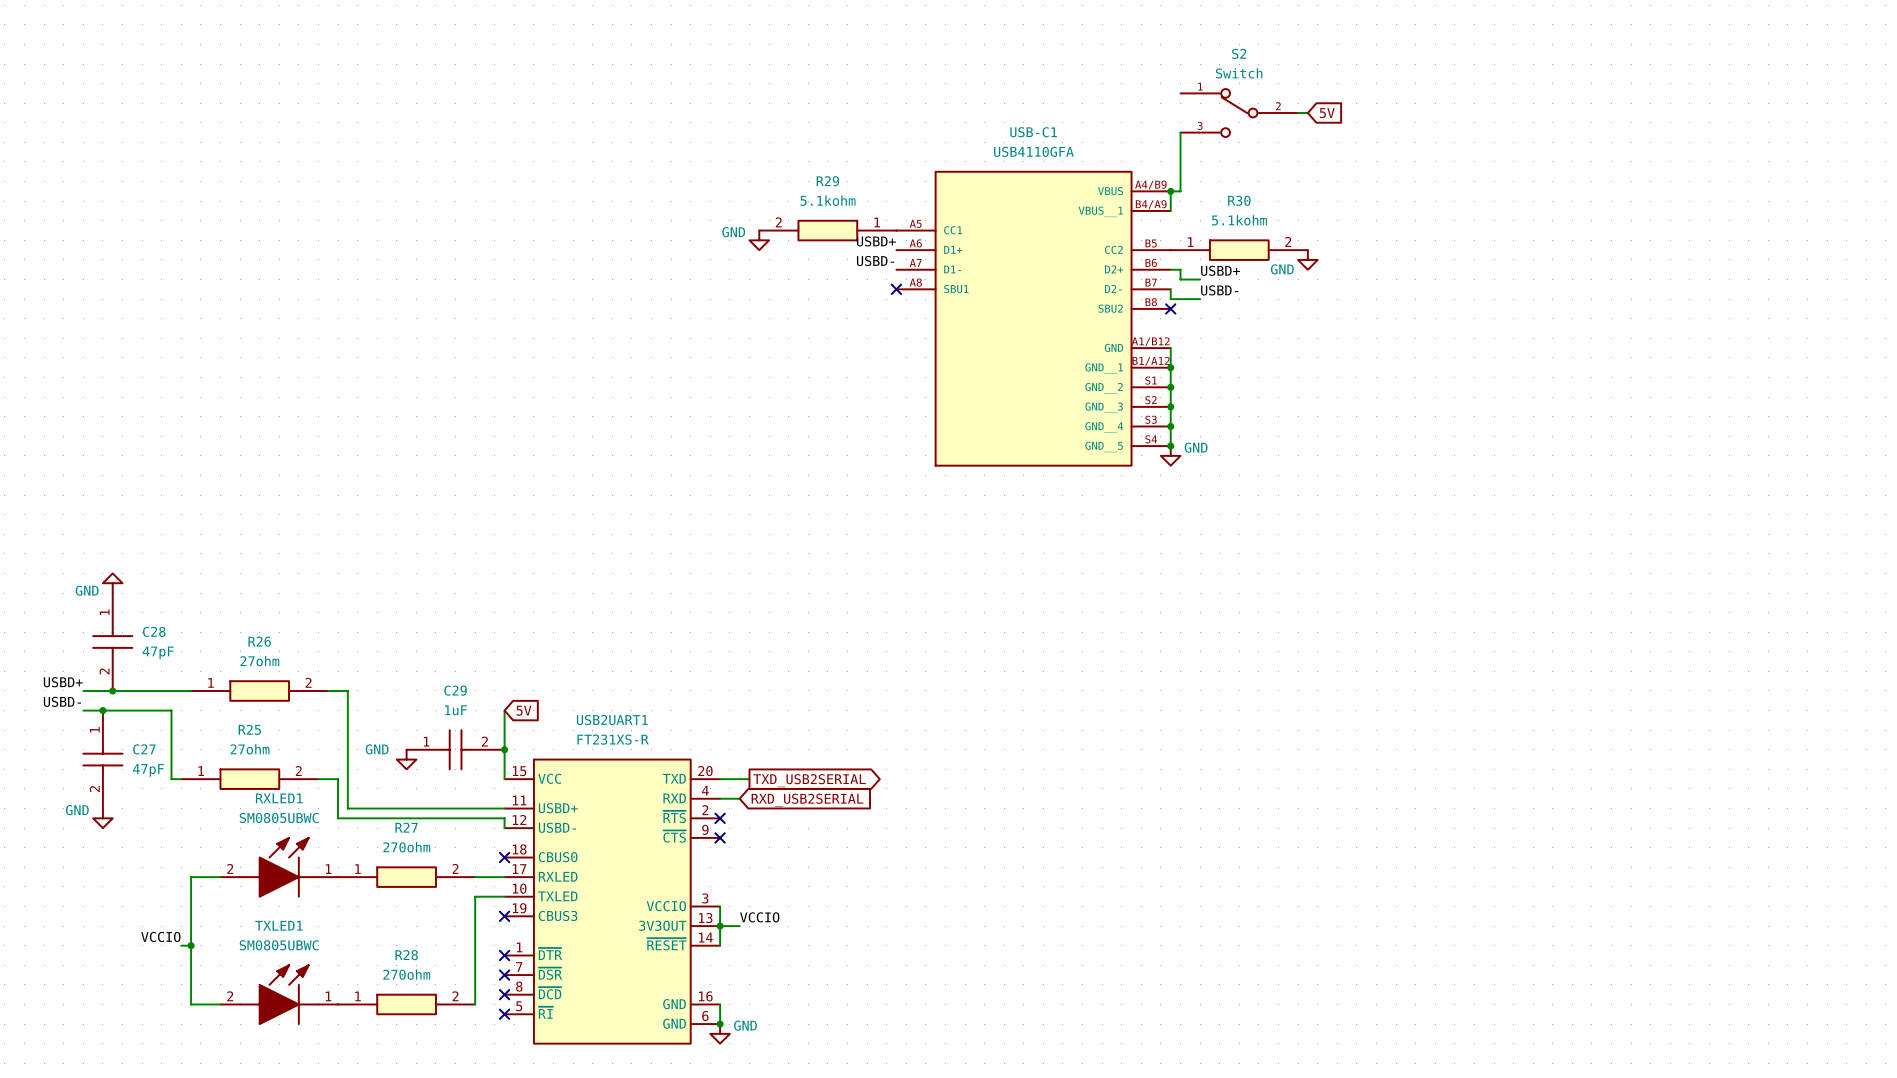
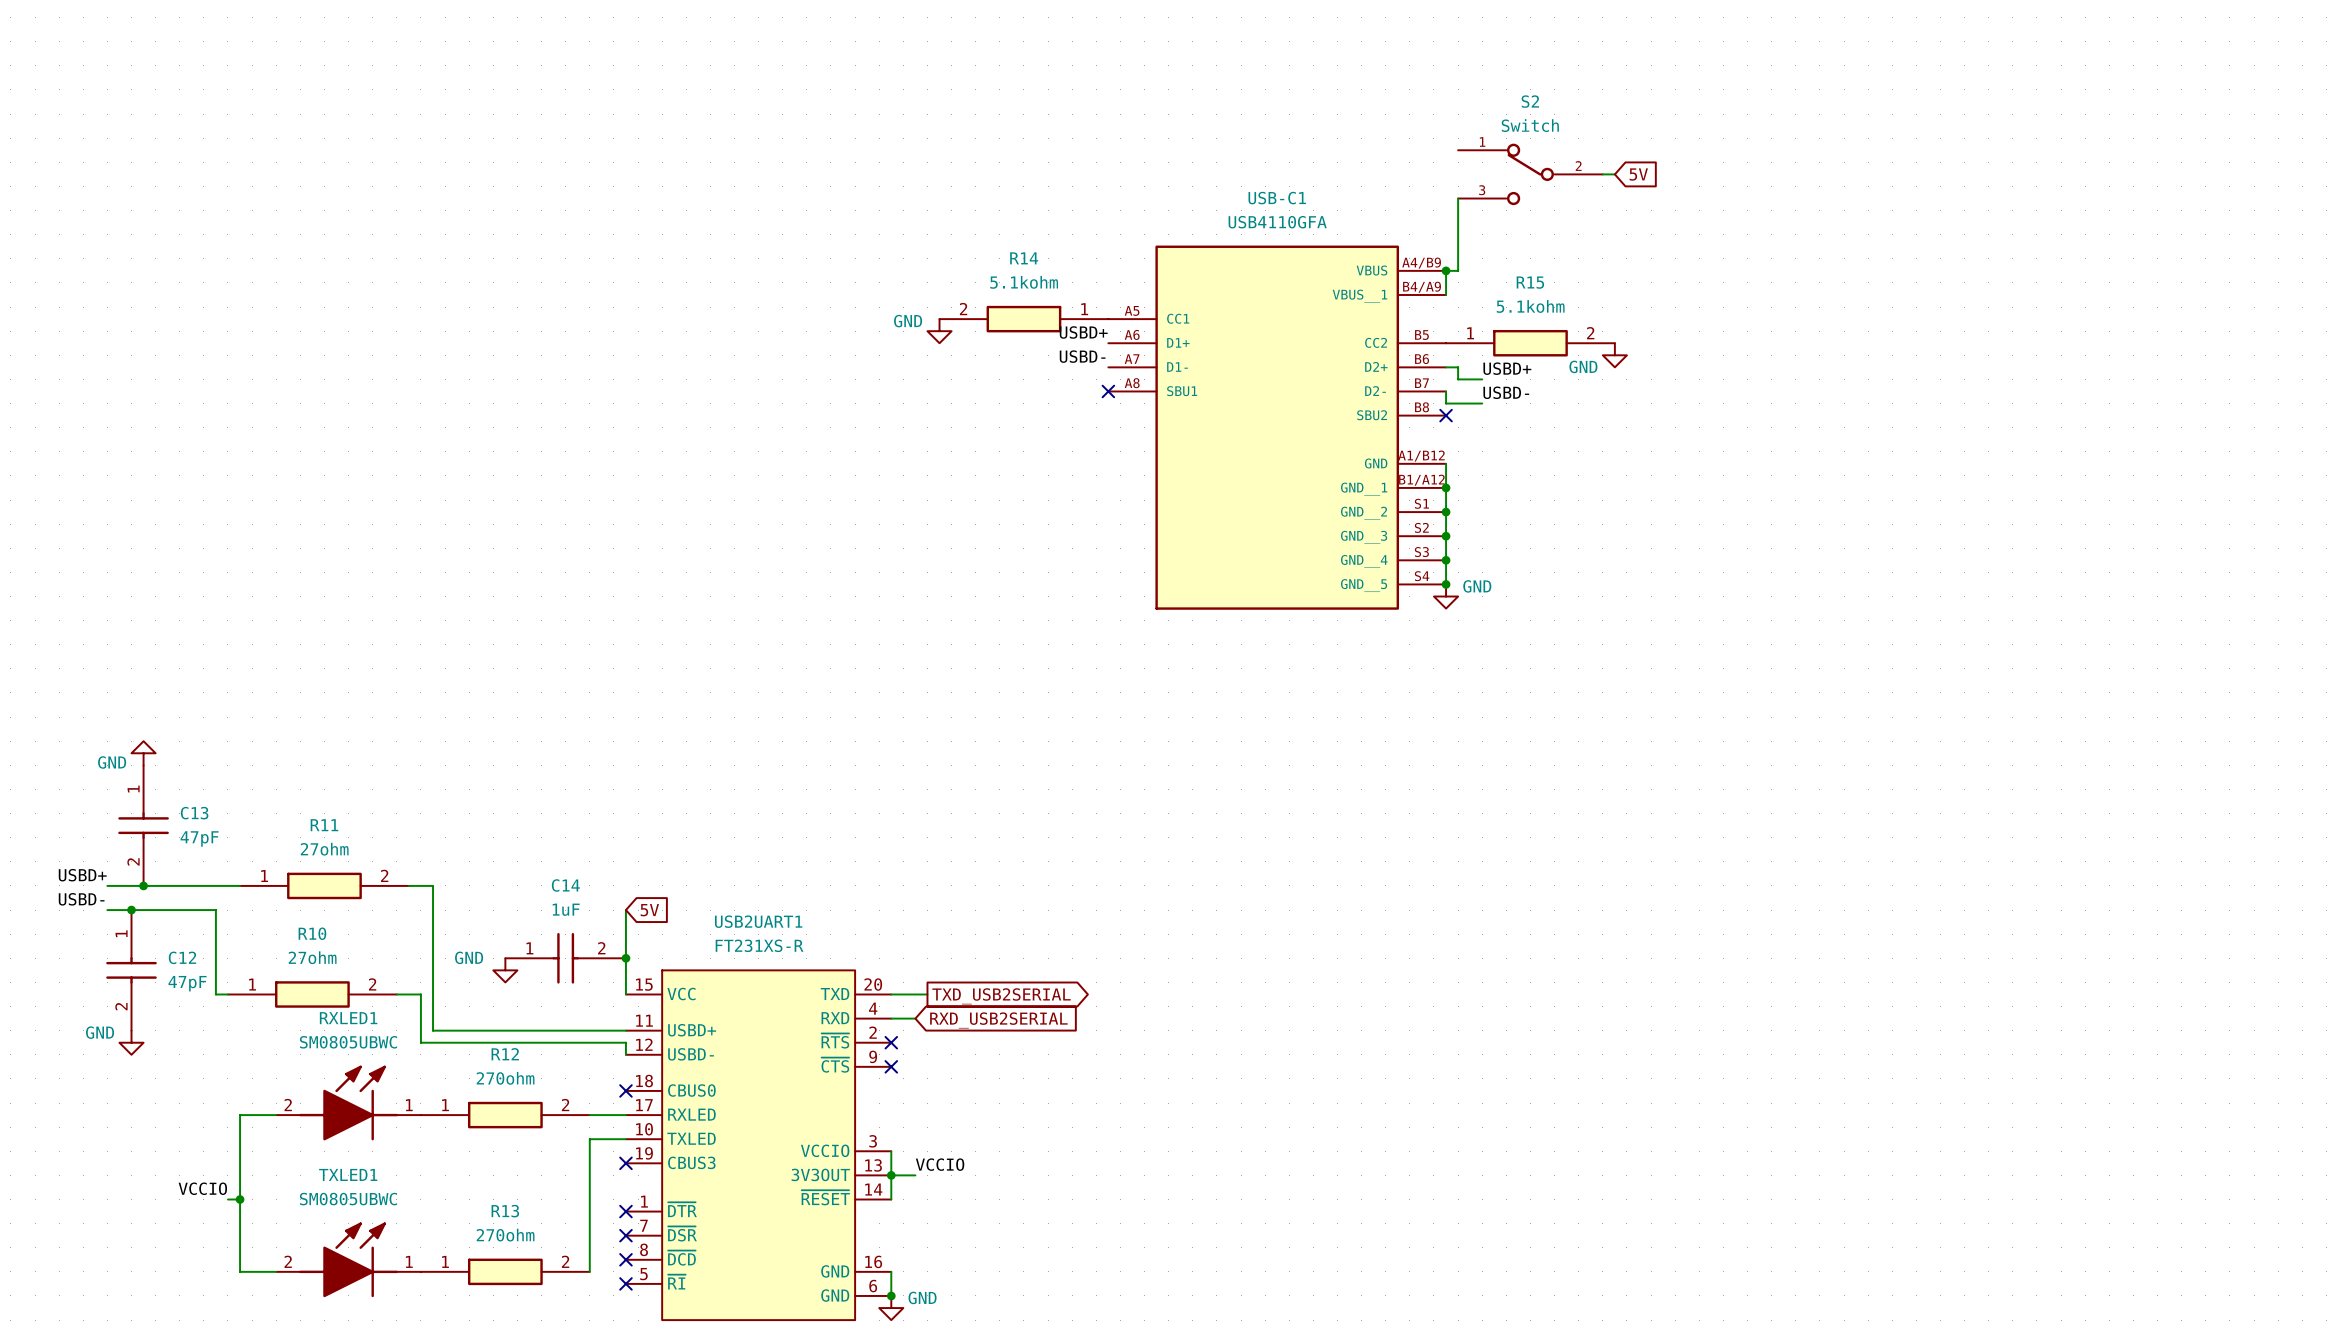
R29 name: R29 (827, 181) -> R14 (1024, 258)
R30 name: R30 (1239, 200) -> R15 (1530, 282)
C28 name: C28 (154, 631) -> C13 (194, 813)
R26 name: R26 (259, 641) -> R11 (324, 825)
C29 name: C29 (455, 690) -> C14 (565, 885)
R25 name: R25 (249, 729) -> R10 (312, 933)
C27 name: C27 (144, 749) -> C12 (182, 957)
R27 name: R27 (406, 827) -> R12 (505, 1054)
R28 name: R28 (406, 955) -> R13 (505, 1211)

